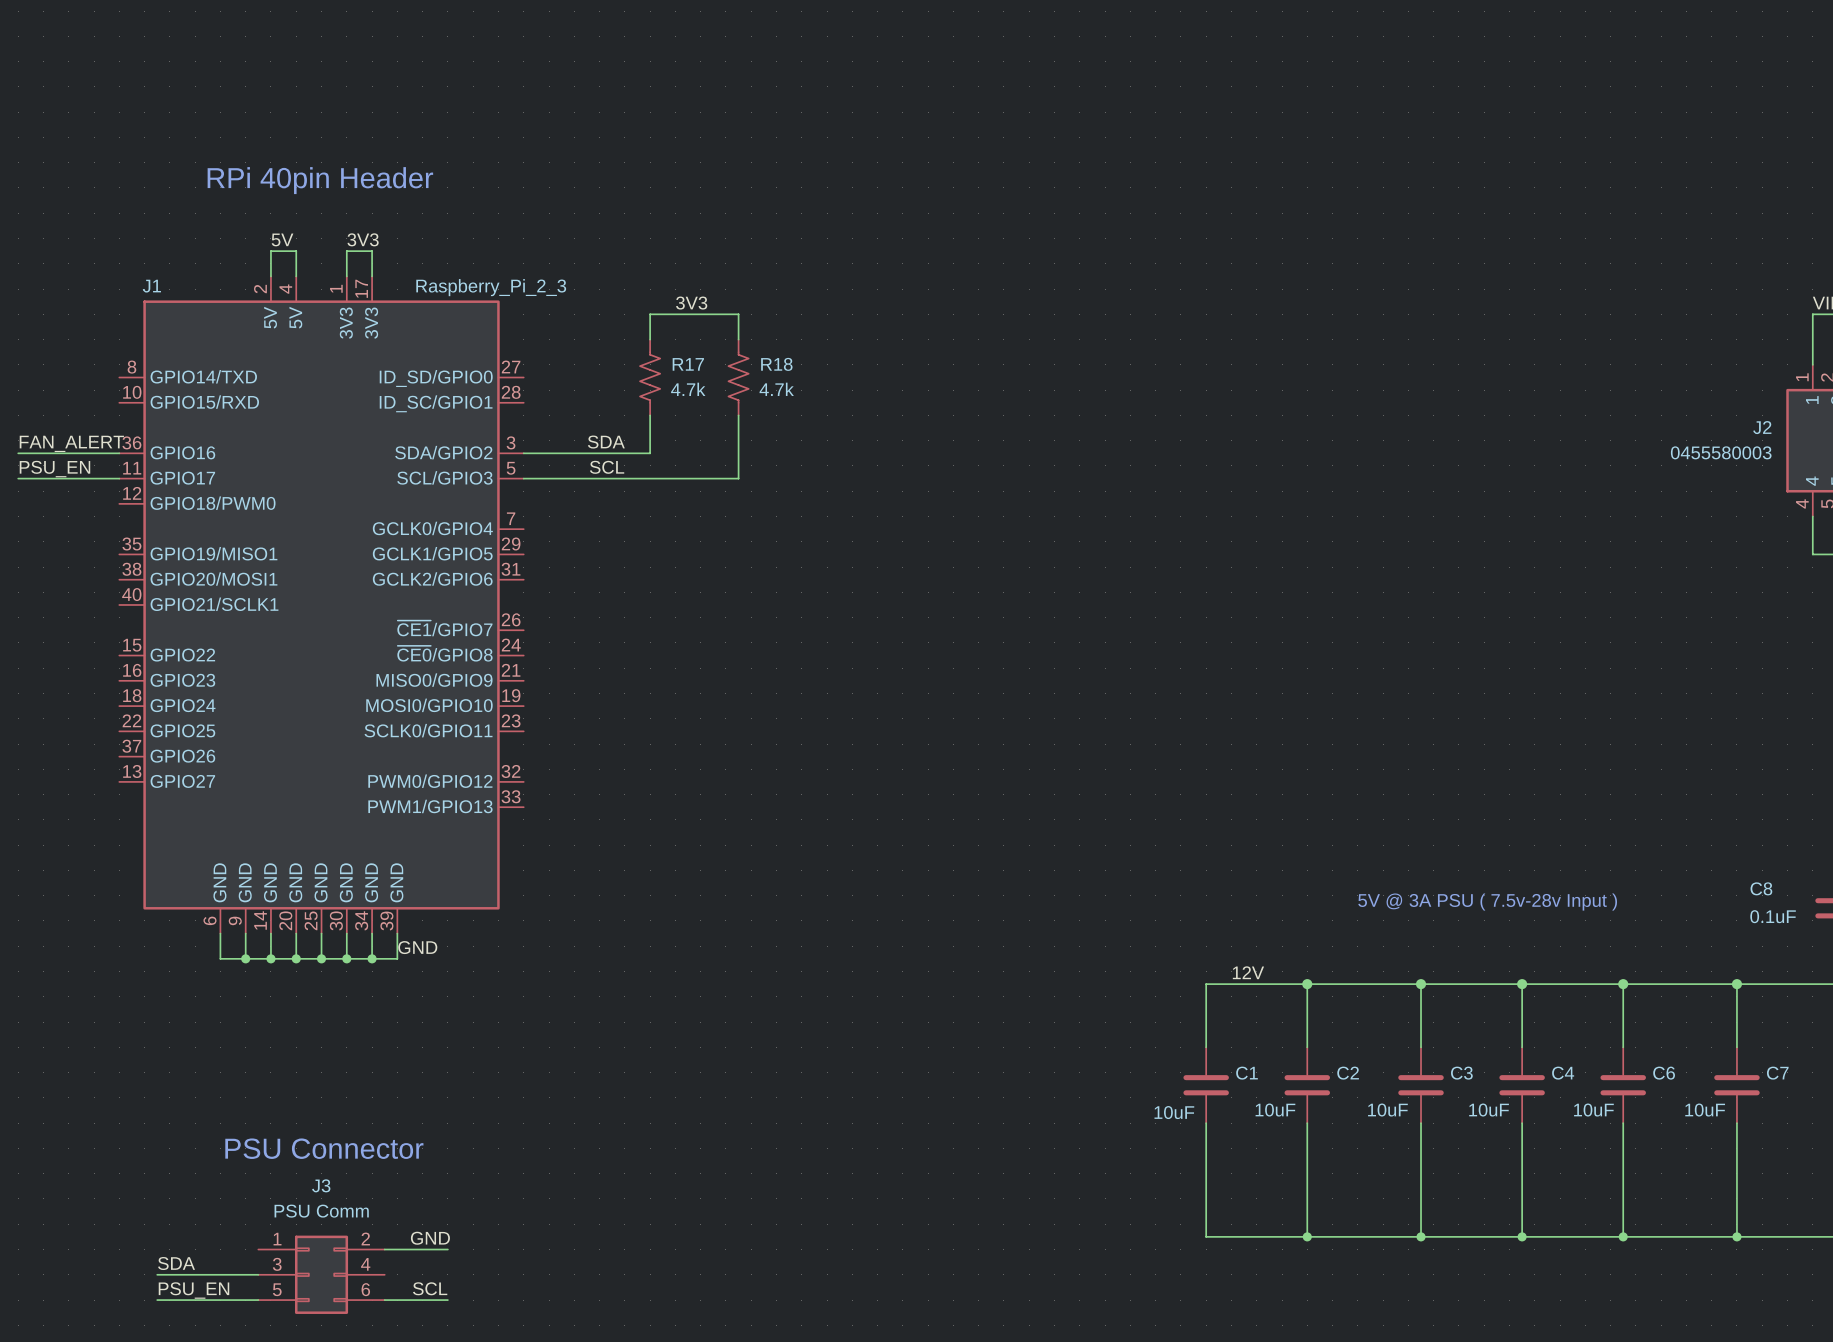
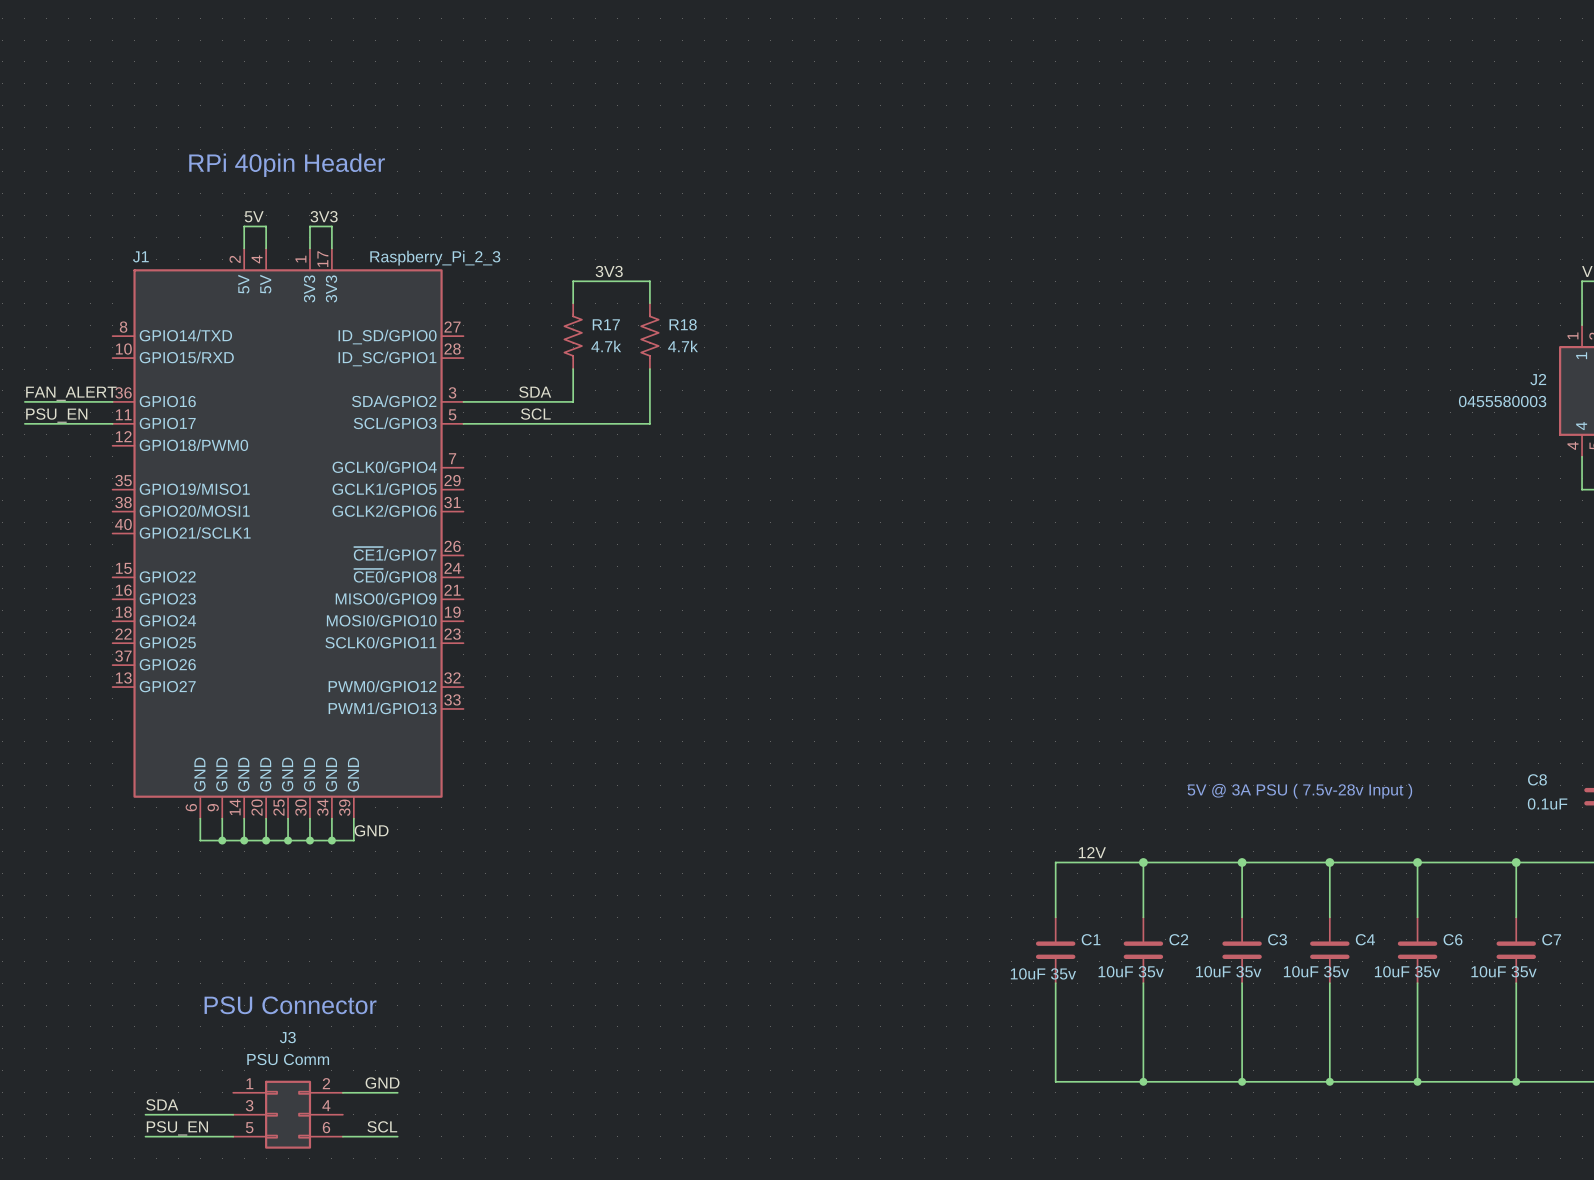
C2 value: 10uF (1275, 1110) -> 10uF 35v (1131, 971)
C3 value: 10uF (1387, 1110) -> 10uF 35v (1228, 971)
C4 value: 10uF (1489, 1110) -> 10uF 35v (1316, 971)
C6 value: 10uF (1593, 1110) -> 10uF 35v (1407, 971)
C7 value: 10uF (1705, 1110) -> 10uF 35v (1503, 971)
C1 value: 10uF (1174, 1112) -> 10uF 35v (1043, 973)

